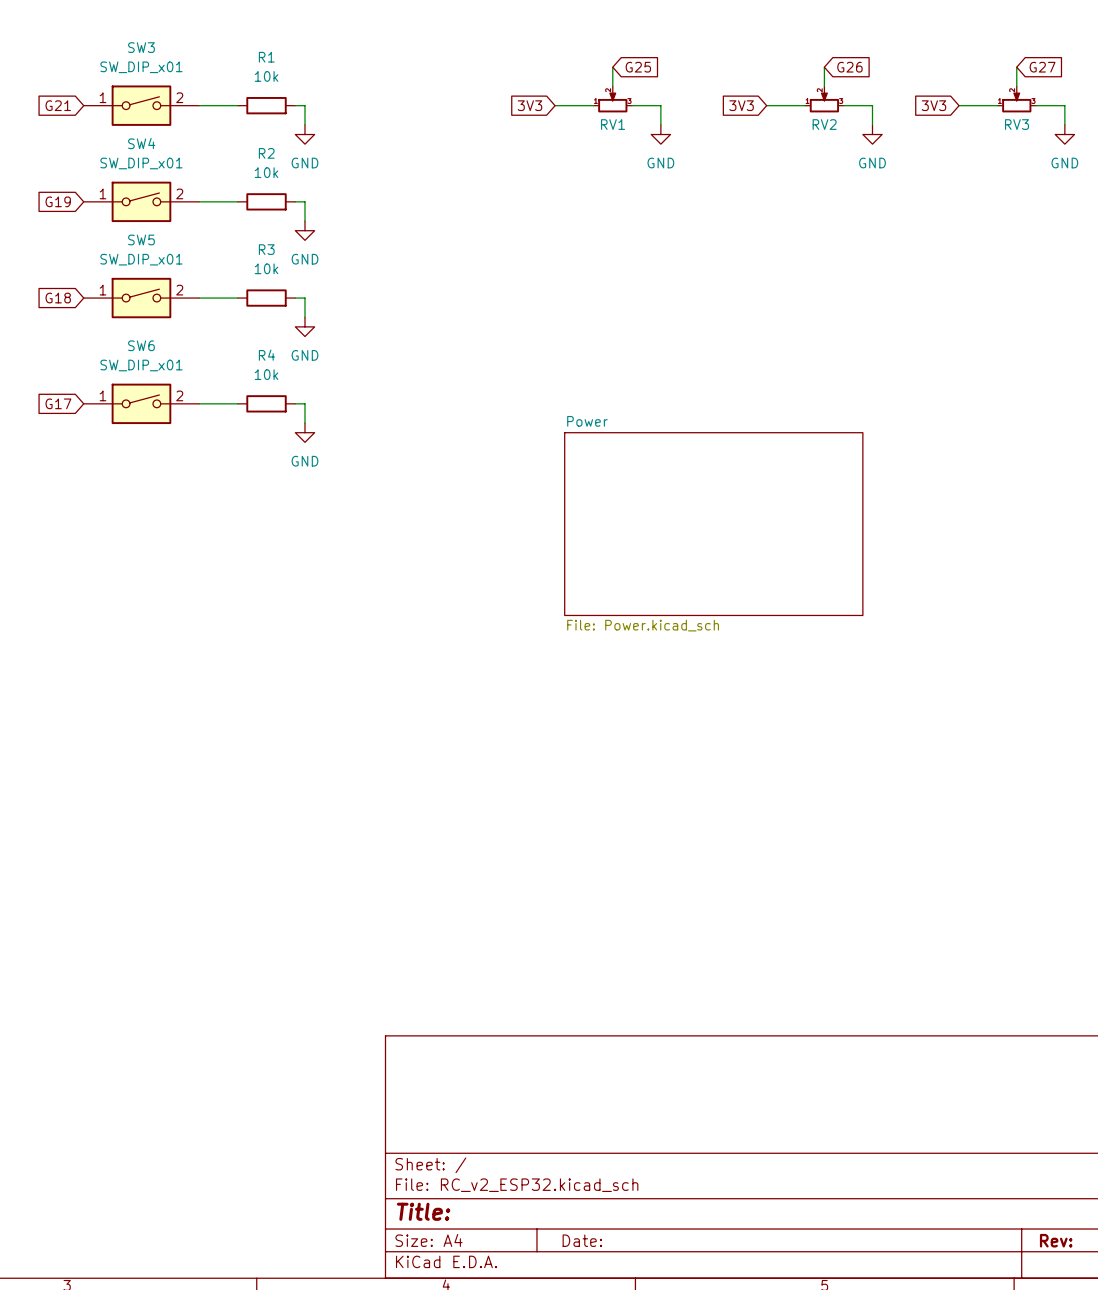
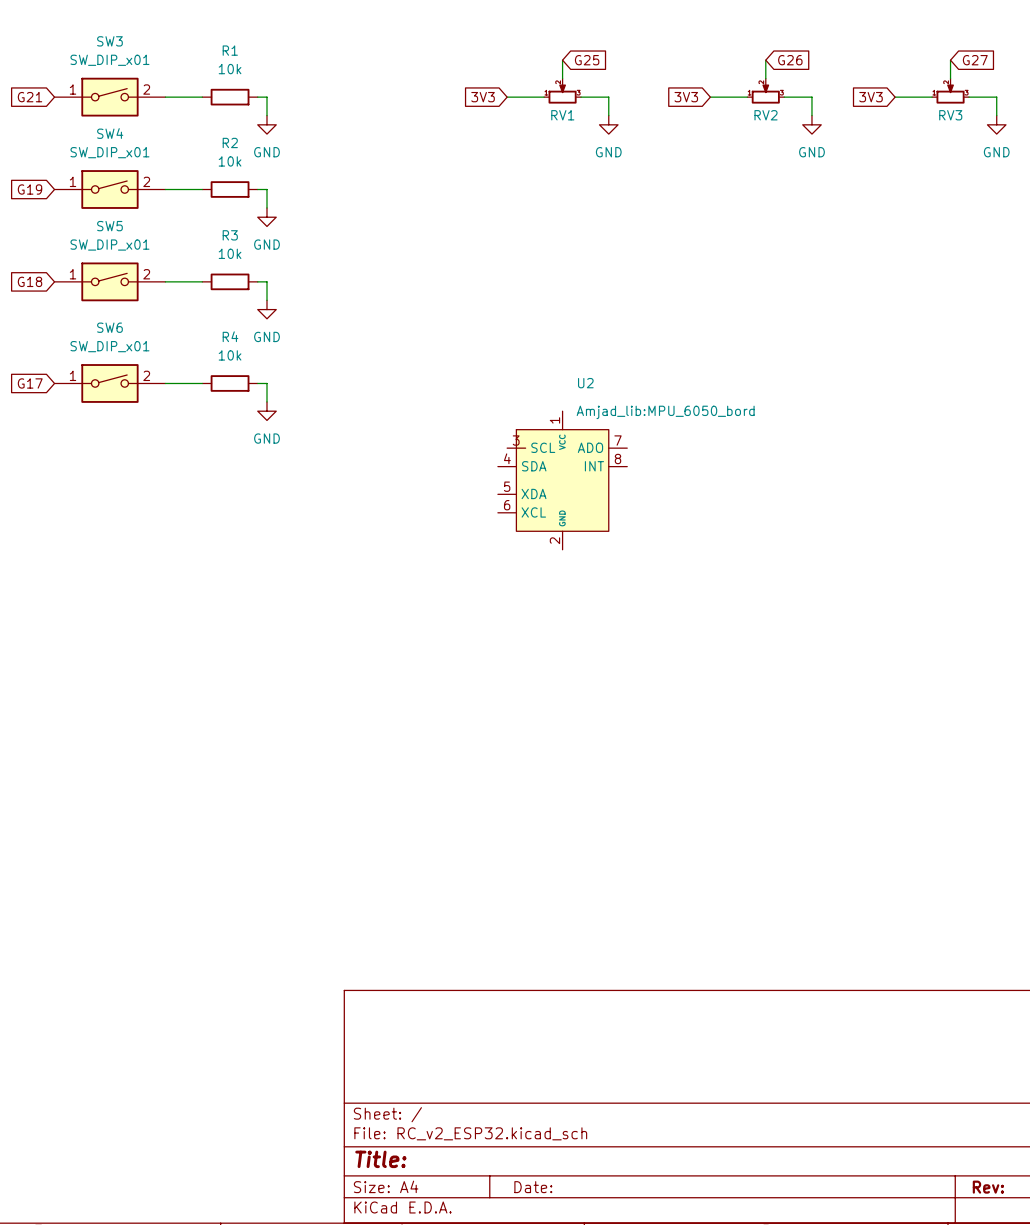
U2: none -> (562, 480)
sheet Power: File: Power.kicad_sch (713, 524) -> none

